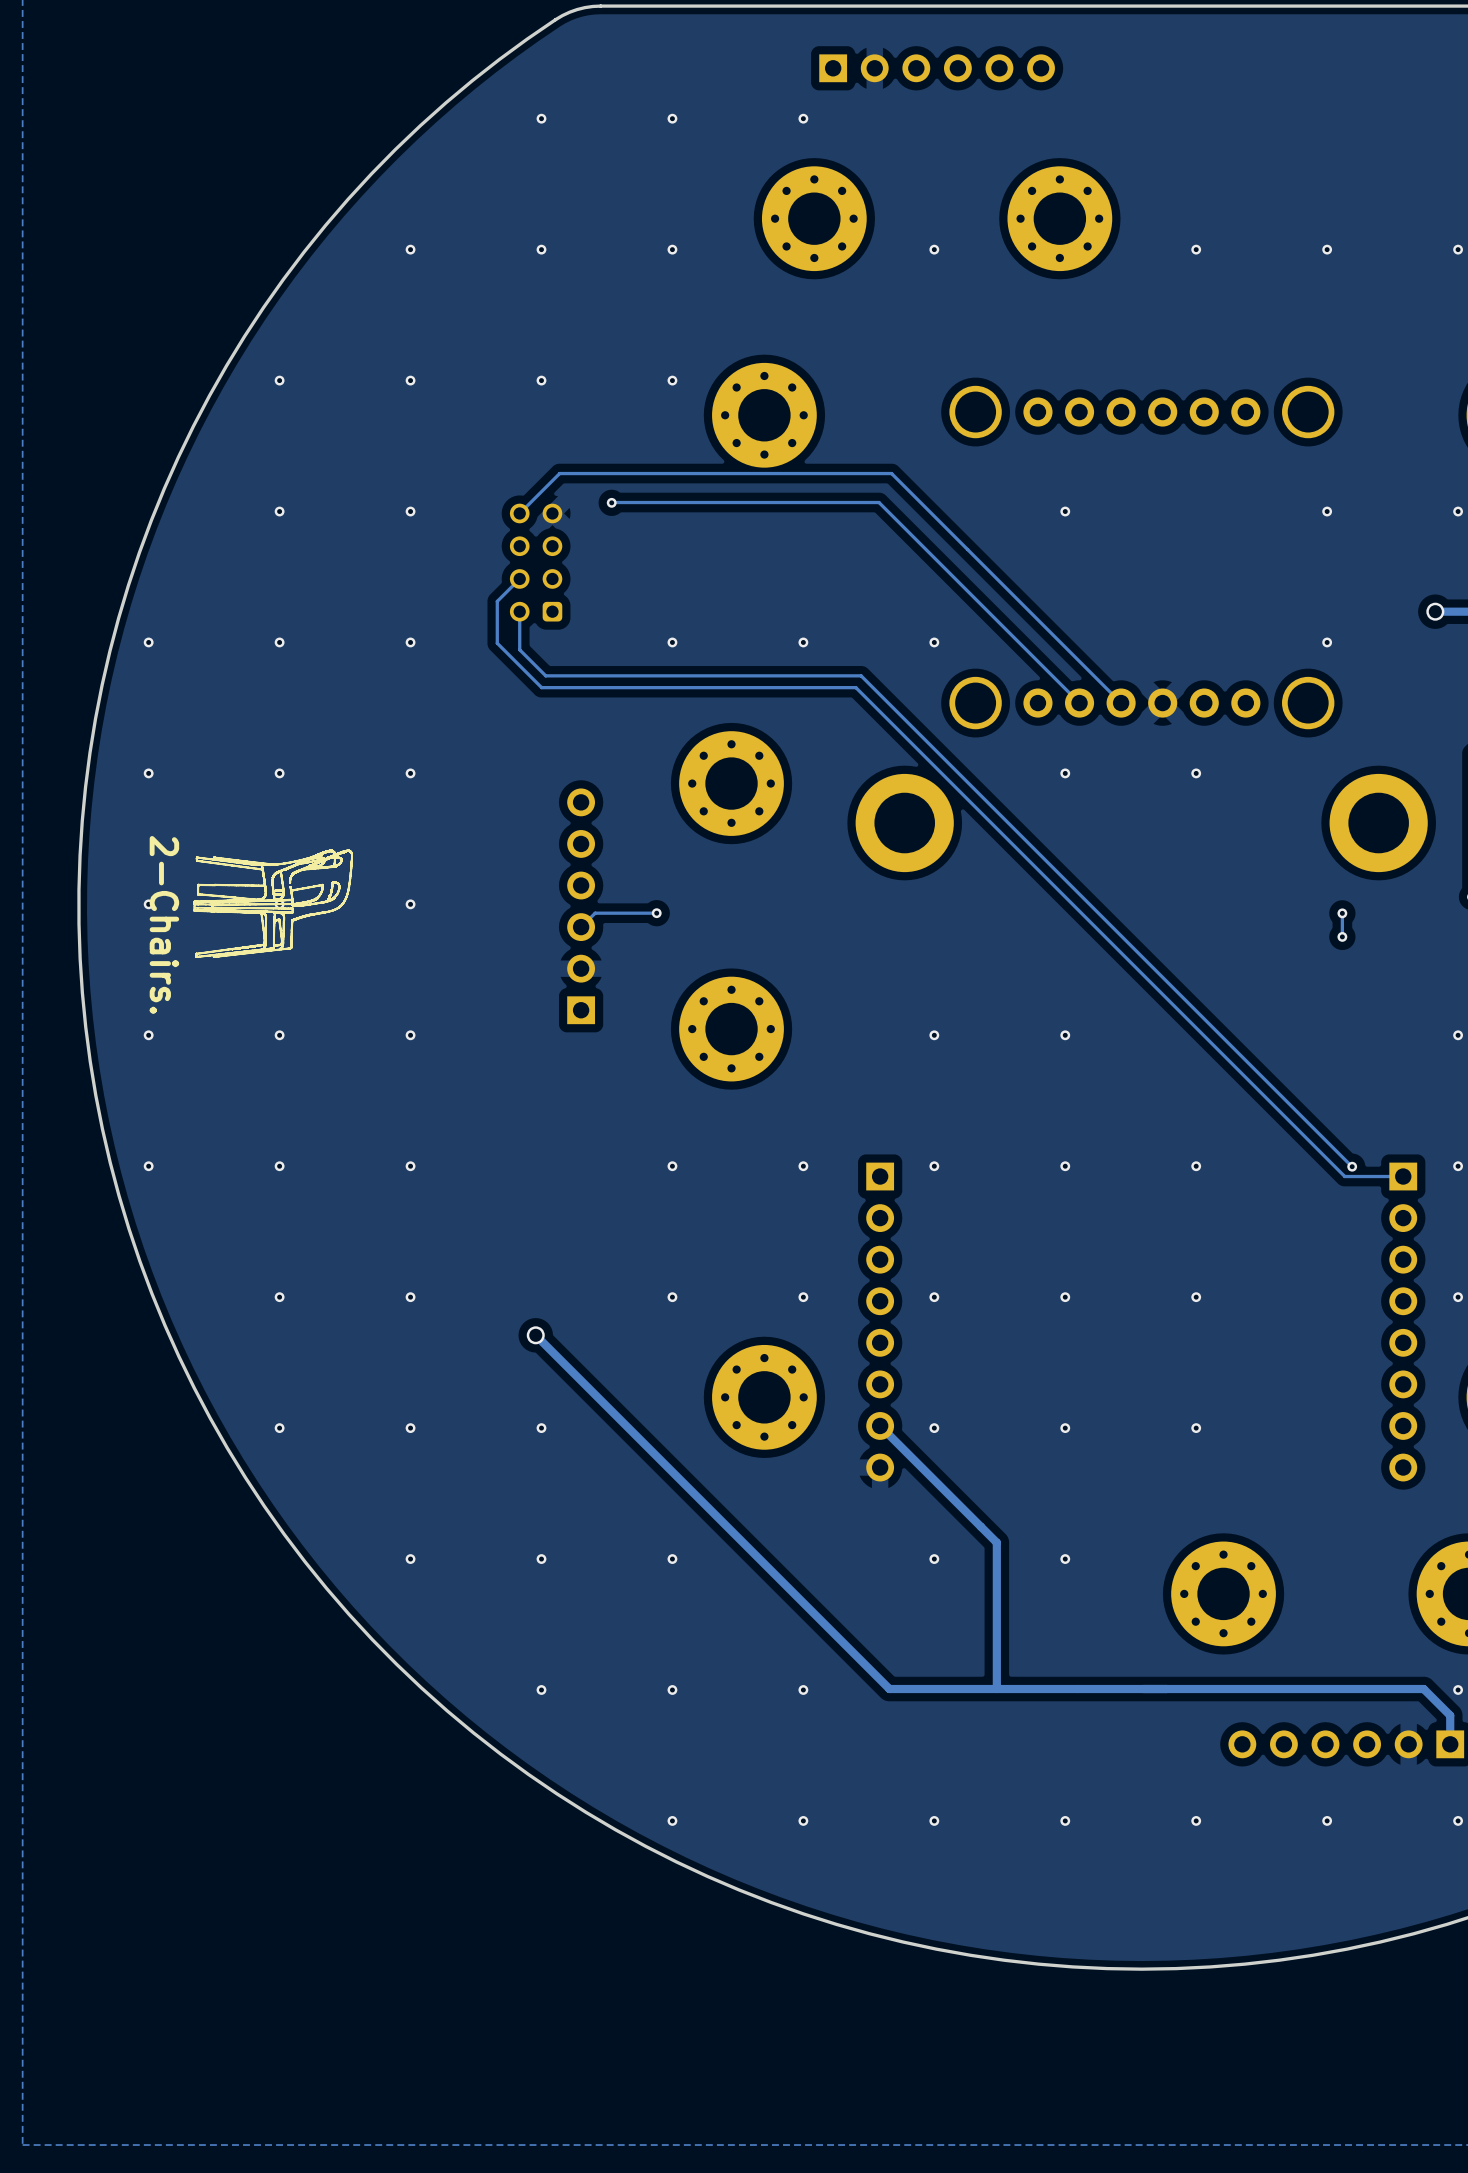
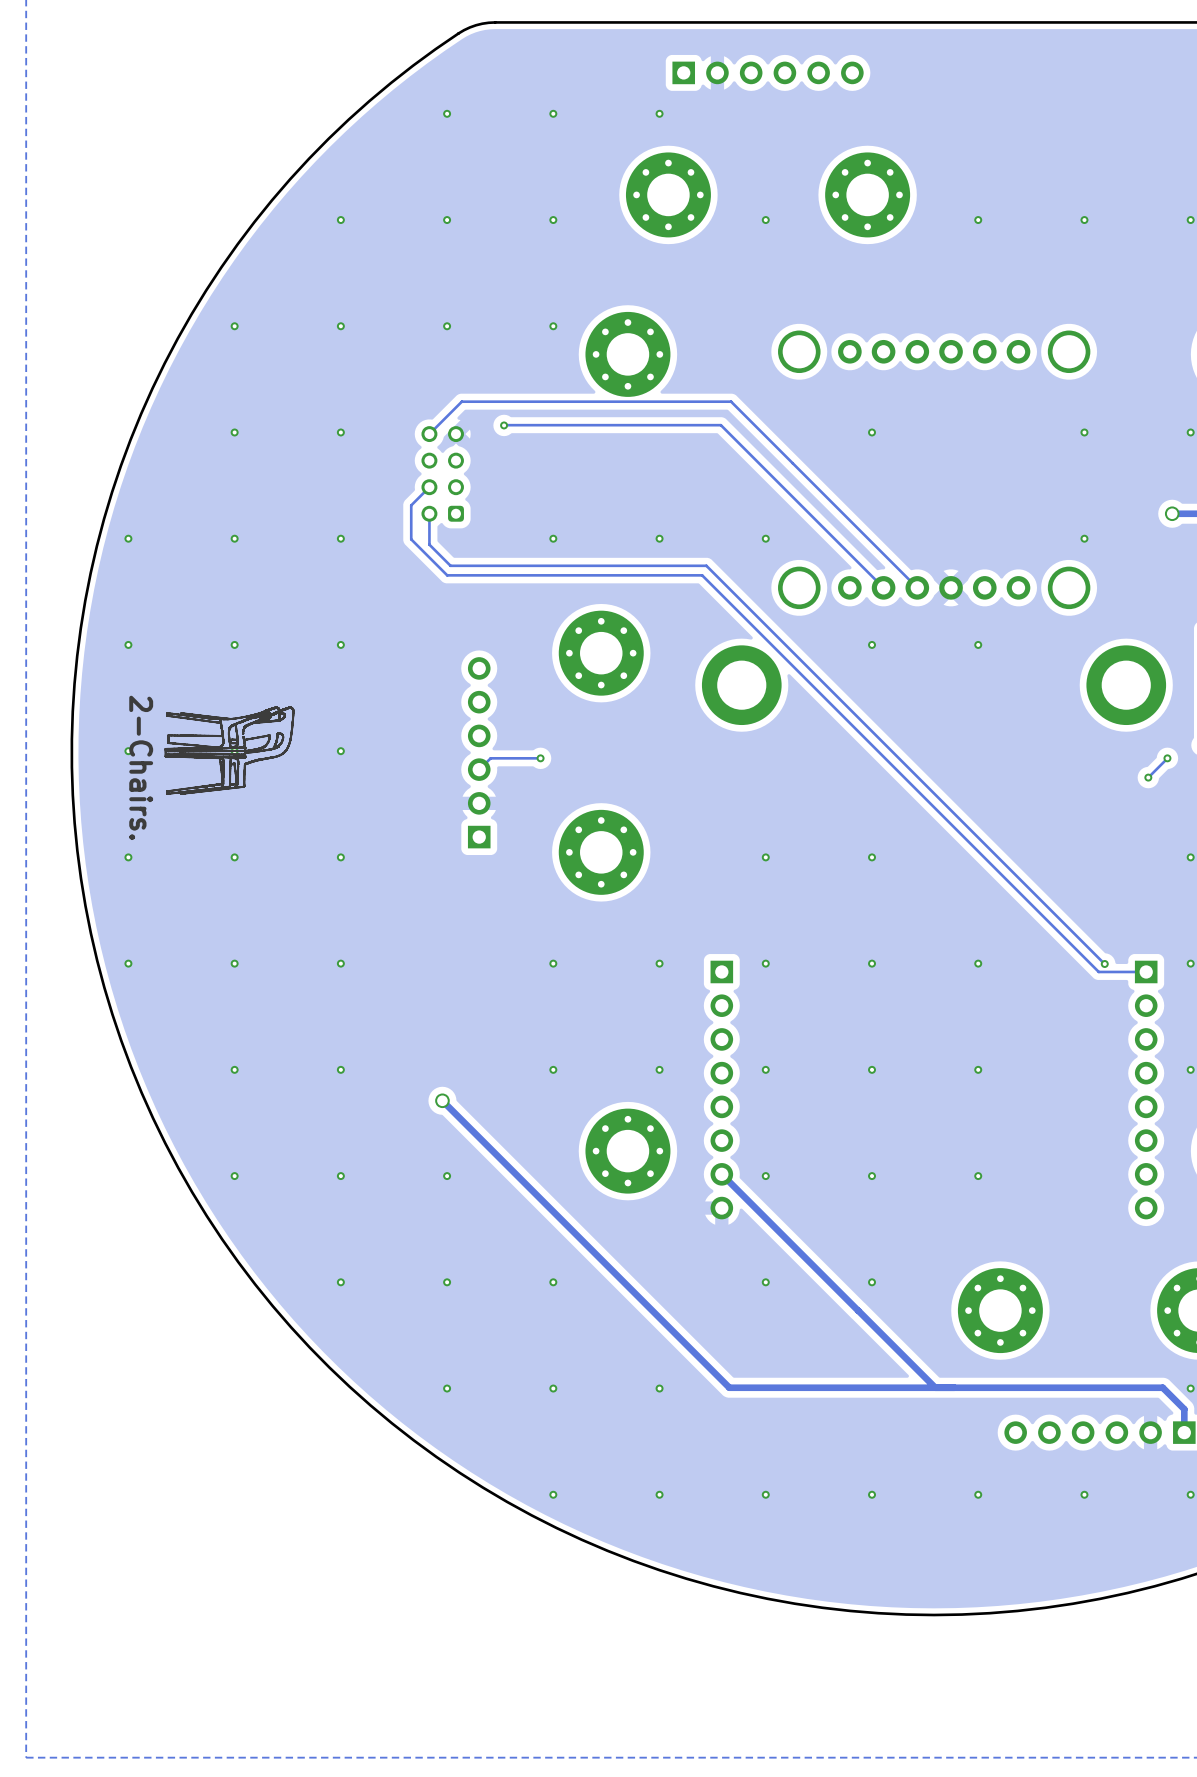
track: (1342, 913) (1342, 936) -> none
via: (1342, 913) -> none
track: none -> (1167, 758) (1148, 777)
via: none -> (1167, 758)
via: (1342, 936) -> none
via: none -> (1148, 777)
track: (996, 1542) (996, 1689) -> (816, 1269) (858, 1310)
track: none -> (858, 1310) (935, 1387)

